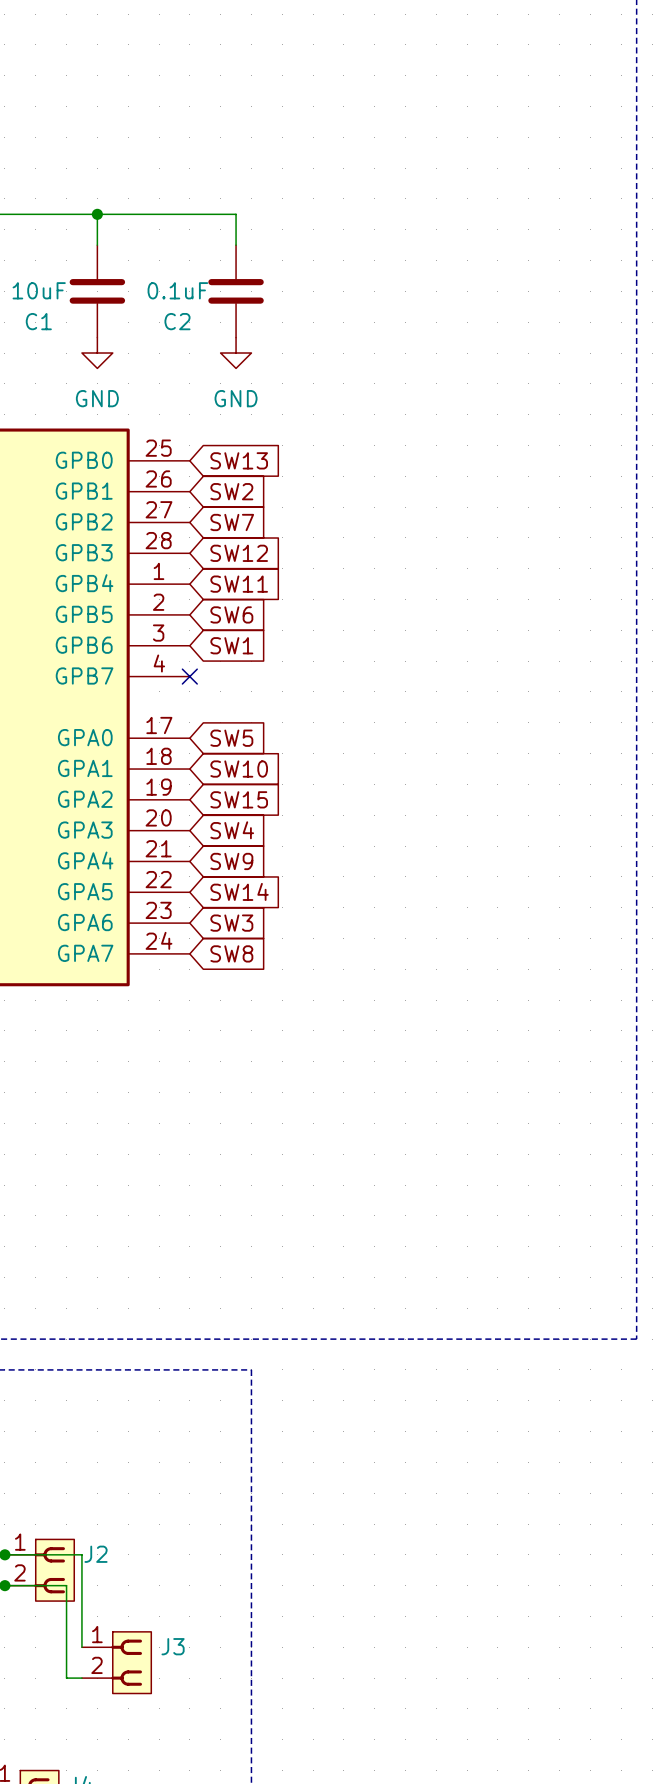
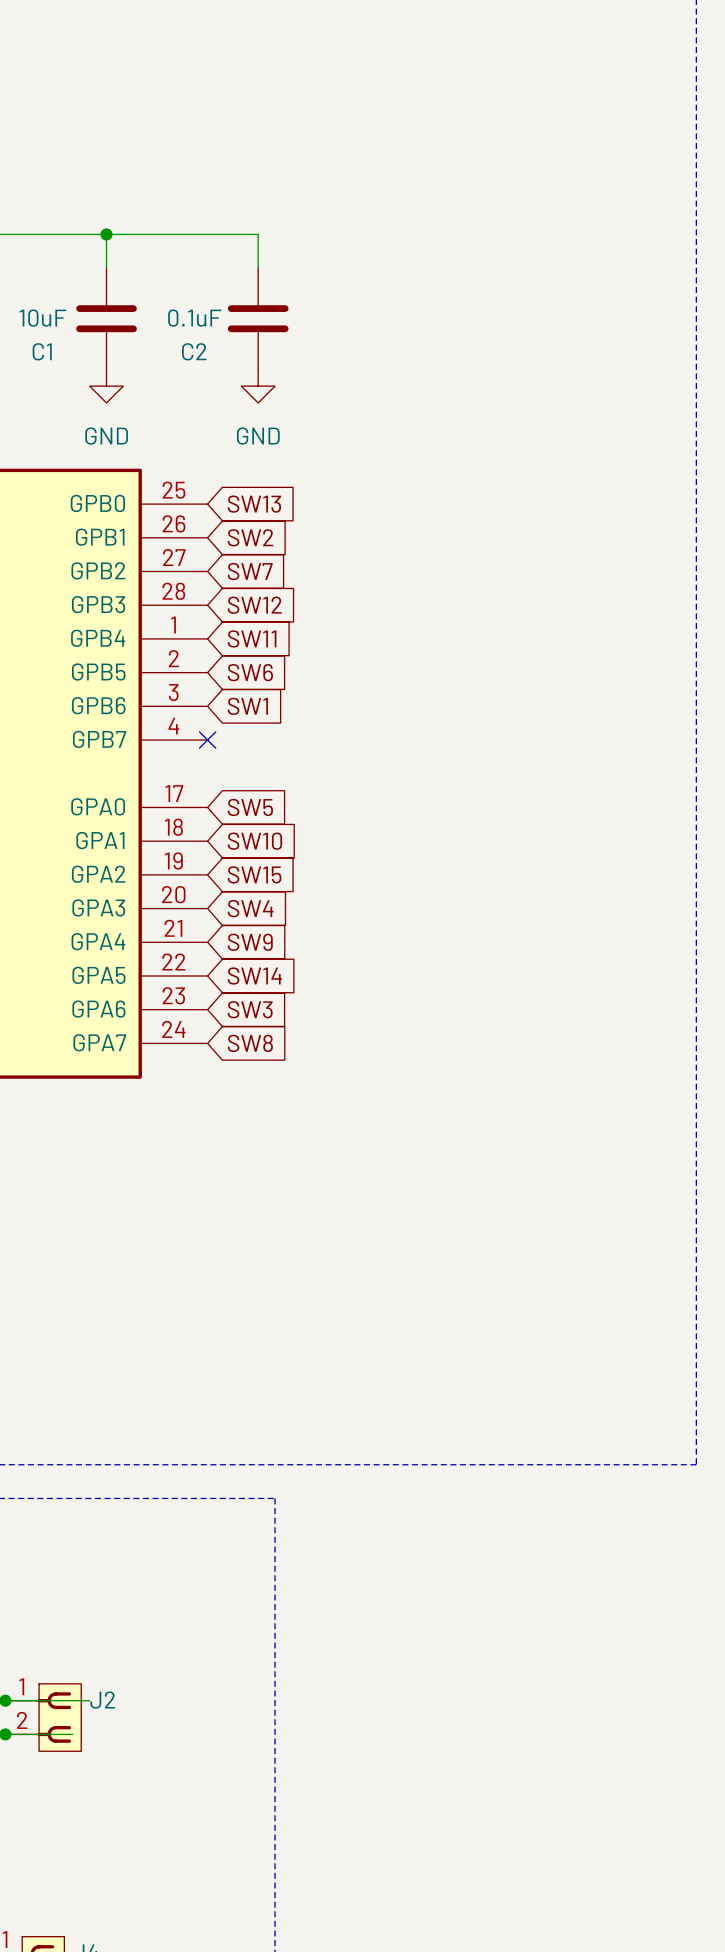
wire: (81, 1554) (81, 1647) -> none
wire: (66, 1585) (66, 1678) (81, 1678) -> none
J3: (116, 1662) -> none

